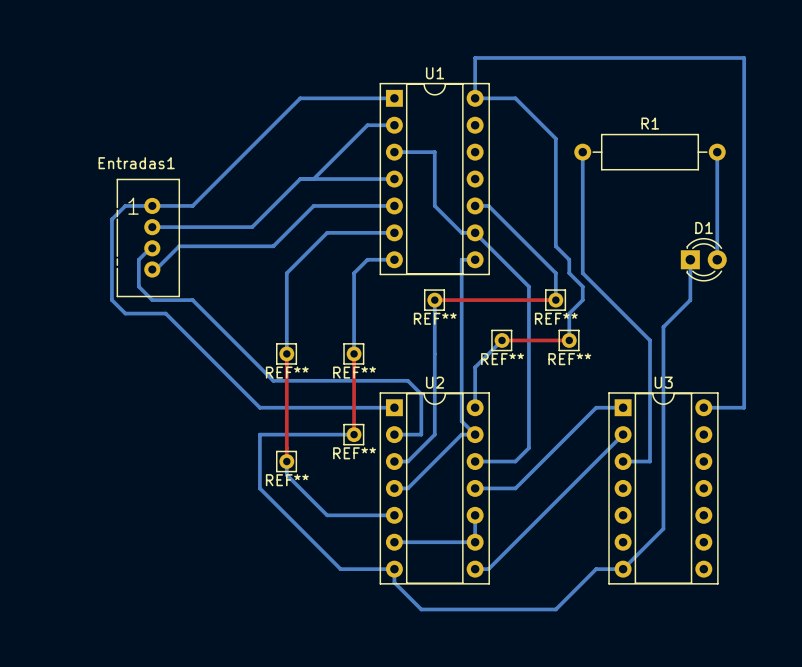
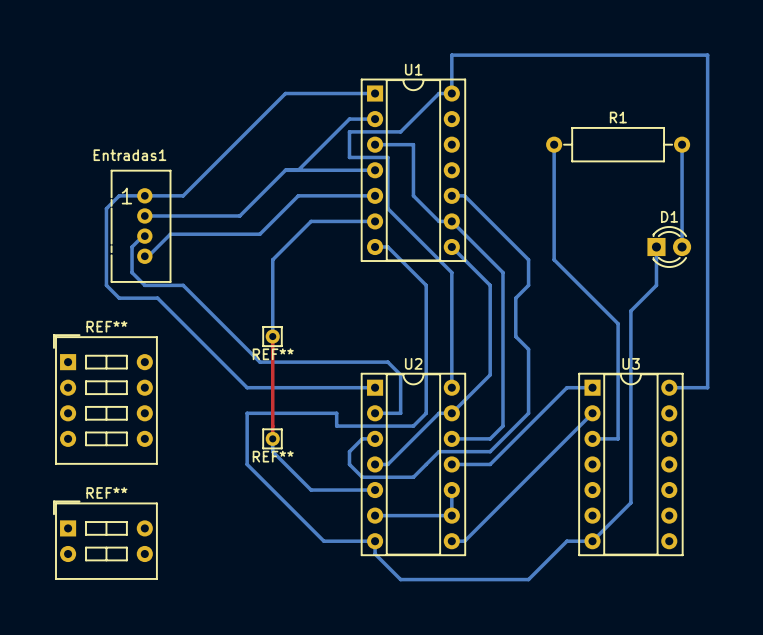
bottom track: (475, 98) (515, 98) (555, 138) (555, 246) (569, 259) (569, 273) (582, 286) (582, 300) (569, 313) (569, 340) -> (451, 93) (439, 93) (400, 131) (349, 131) (349, 157) (387, 157) (387, 208) (451, 272) (451, 349)
bottom track: (394, 259) (367, 259) (354, 273) (354, 353) -> (375, 247) (387, 247) (426, 285) (426, 413) (413, 426) (336, 426) (336, 413)
bottom track: (475, 259) (461, 259) (461, 421) (475, 434) -> (451, 247) (490, 285) (490, 374) (451, 413)
top track: (434, 300) (555, 300) -> none
bottom track: (434, 300) (434, 434) (407, 461) (394, 461) -> (528, 285) (515, 298) (515, 336) (528, 349) (528, 413) (490, 451) (439, 451) (413, 477) (362, 477) (349, 464) (349, 451) (362, 438) (375, 438)
REF**: (434, 300) -> none
REF**: (555, 300) -> none
REF**: (501, 340) -> none
top track: (502, 340) (569, 340) -> none
bottom track: (502, 340) (475, 367) -> none
REF**: (569, 340) -> none
REF**: (353, 353) -> none
top track: (354, 353) (354, 434) -> none
REF**: none -> (105, 399)
REF**: (353, 434) -> none
REF**: none -> (105, 540)

